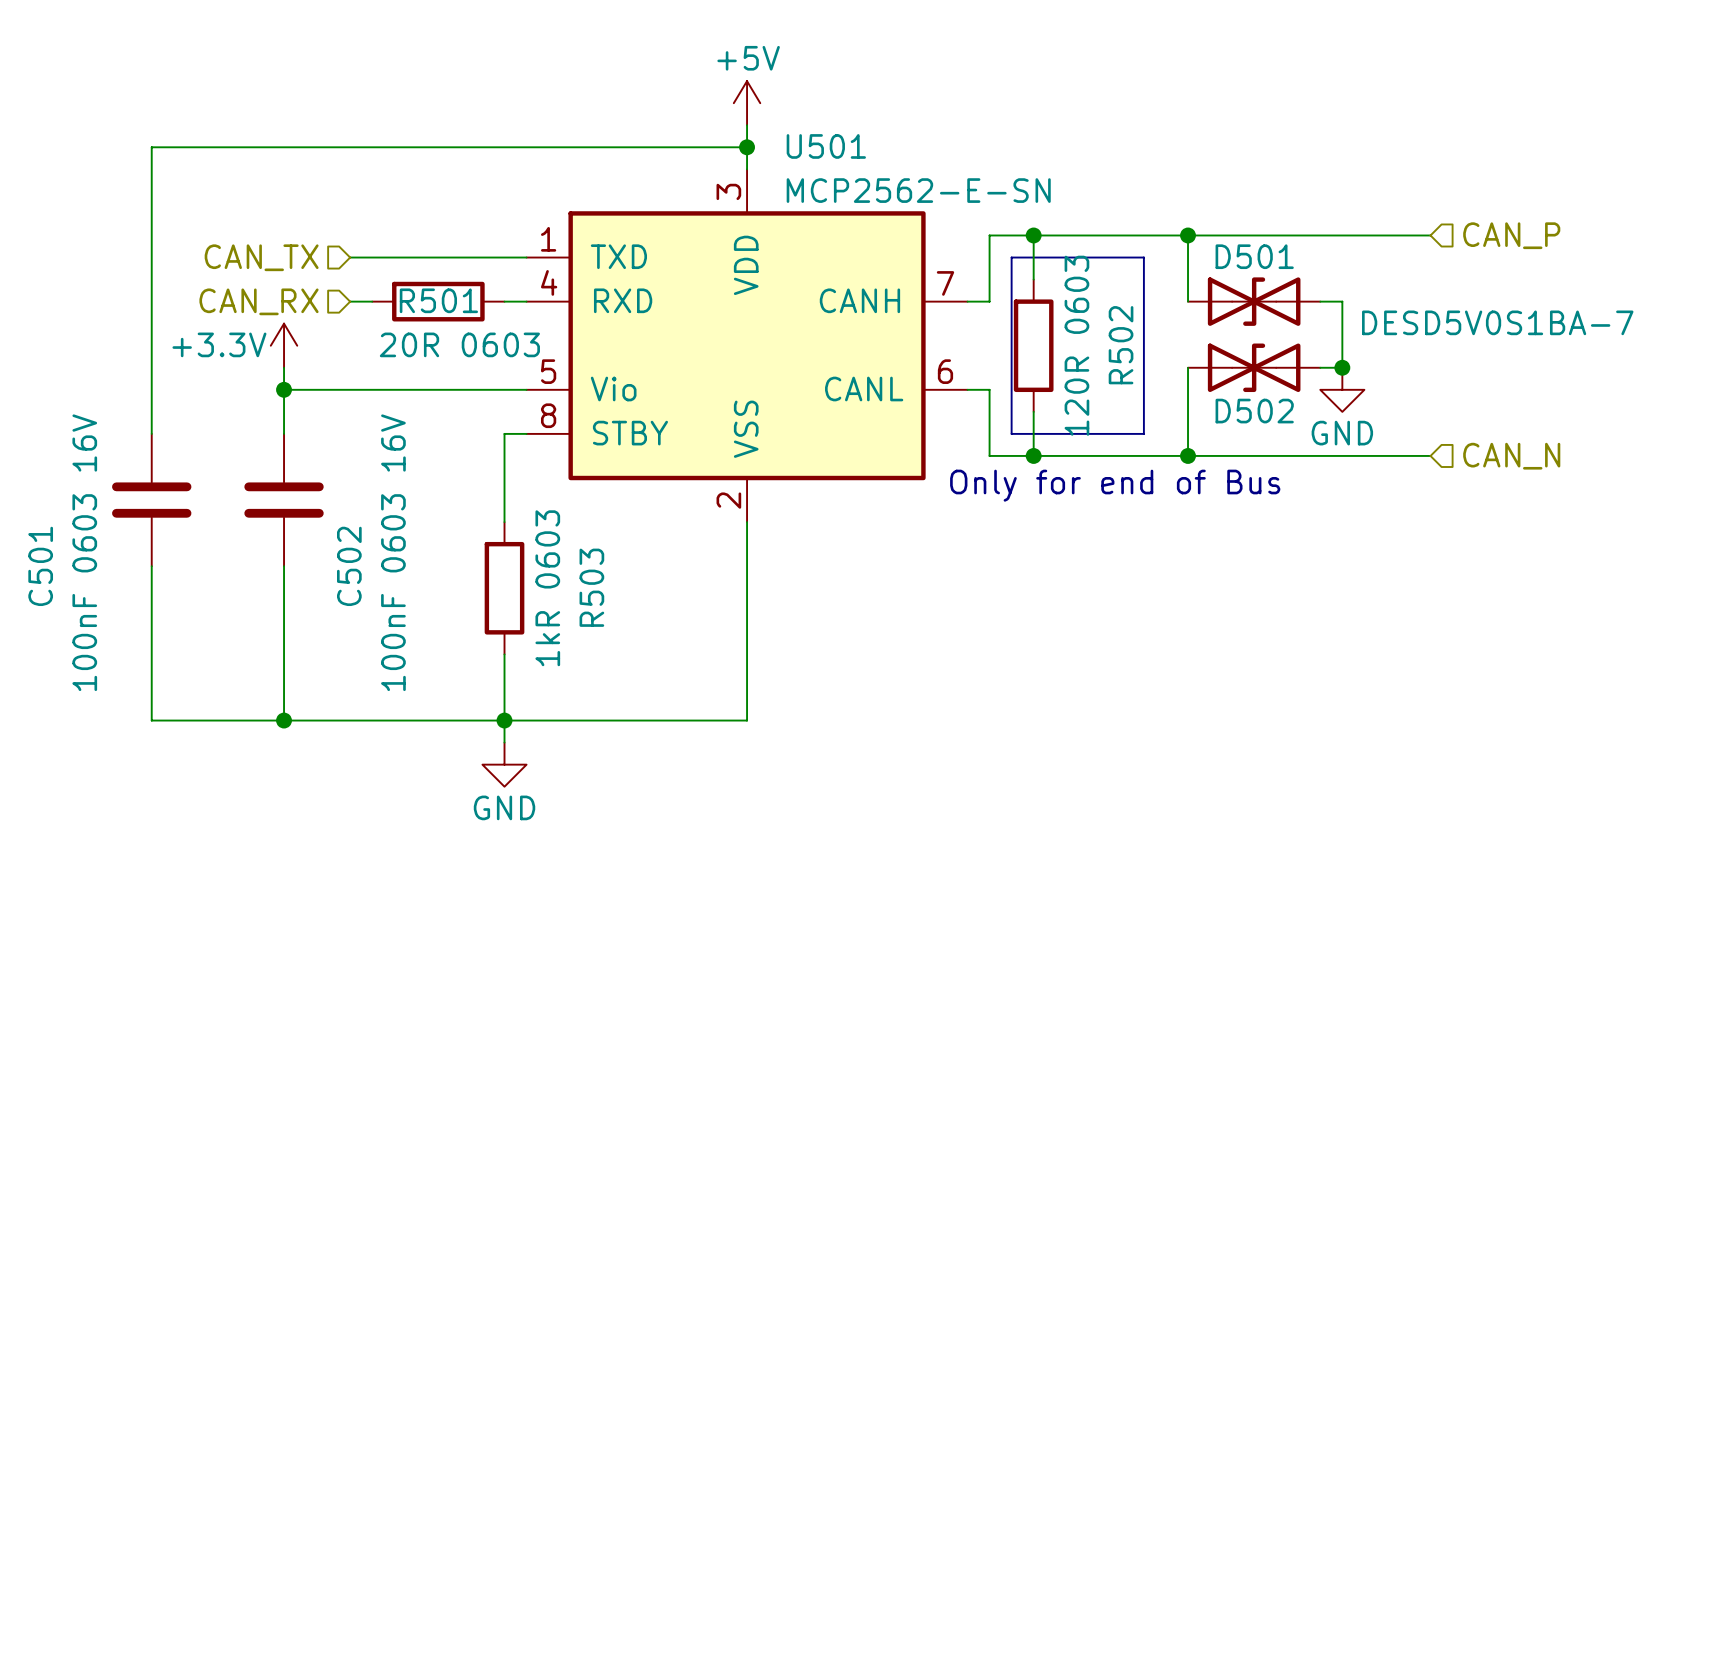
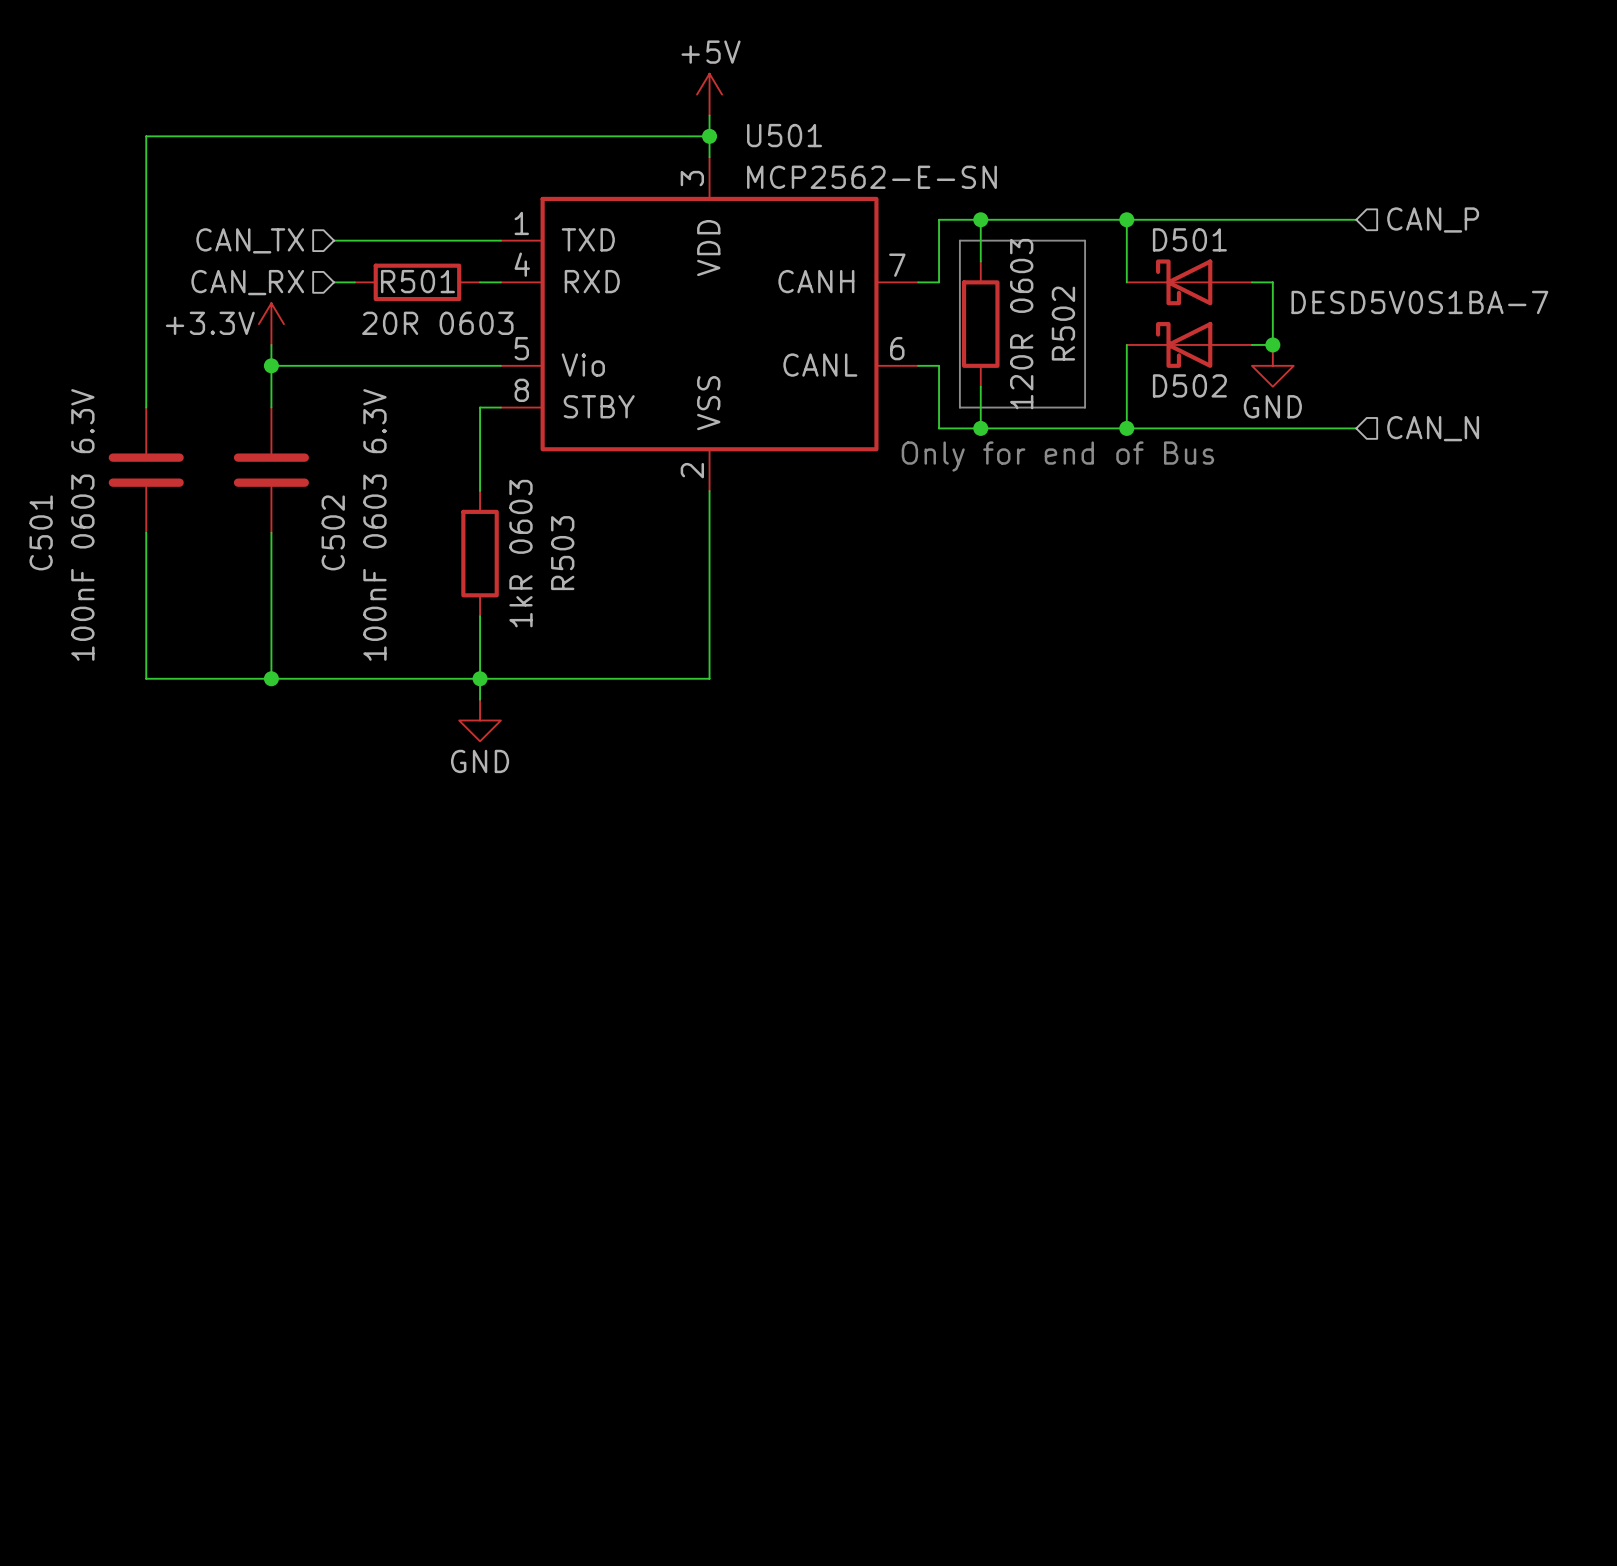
D501 symbol: [1188, 277, 1321, 326] -> [1126, 259, 1252, 306]
D502 symbol: [1188, 343, 1321, 393] -> [1126, 322, 1252, 368]
C501 value: 100nF 0603 16V (84, 552) -> 100nF 0603 6.3V (82, 524)
C502 value: 100nF 0603 16V (393, 552) -> 100nF 0603 6.3V (374, 524)

